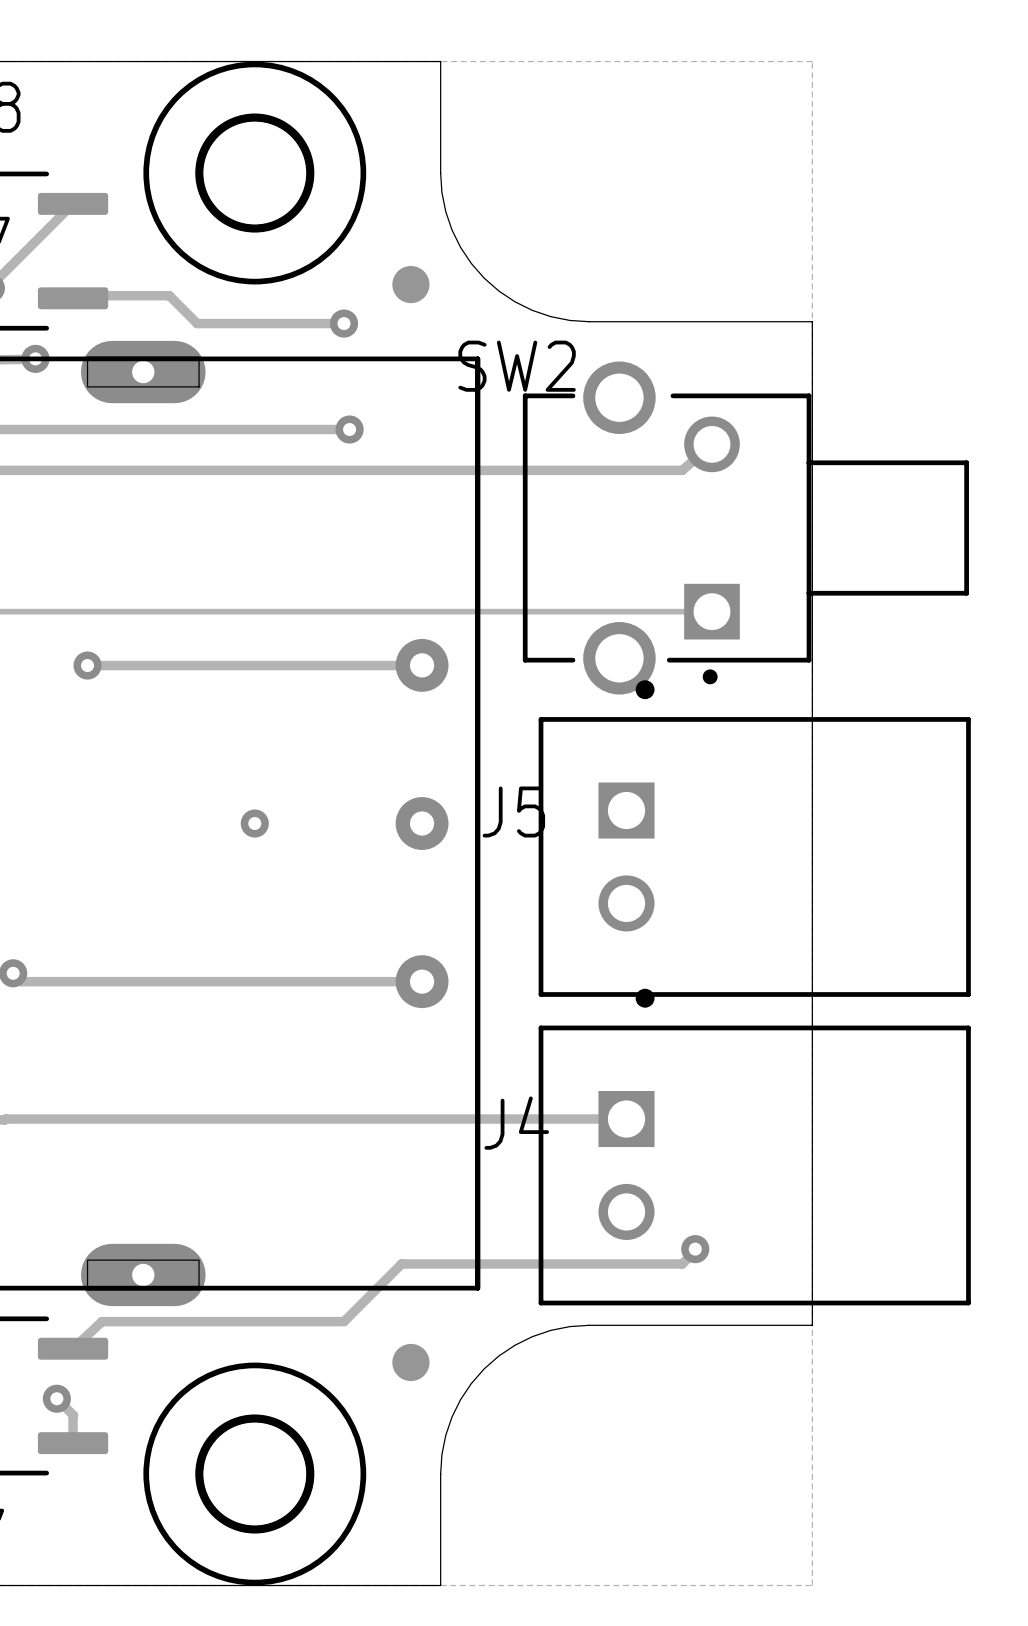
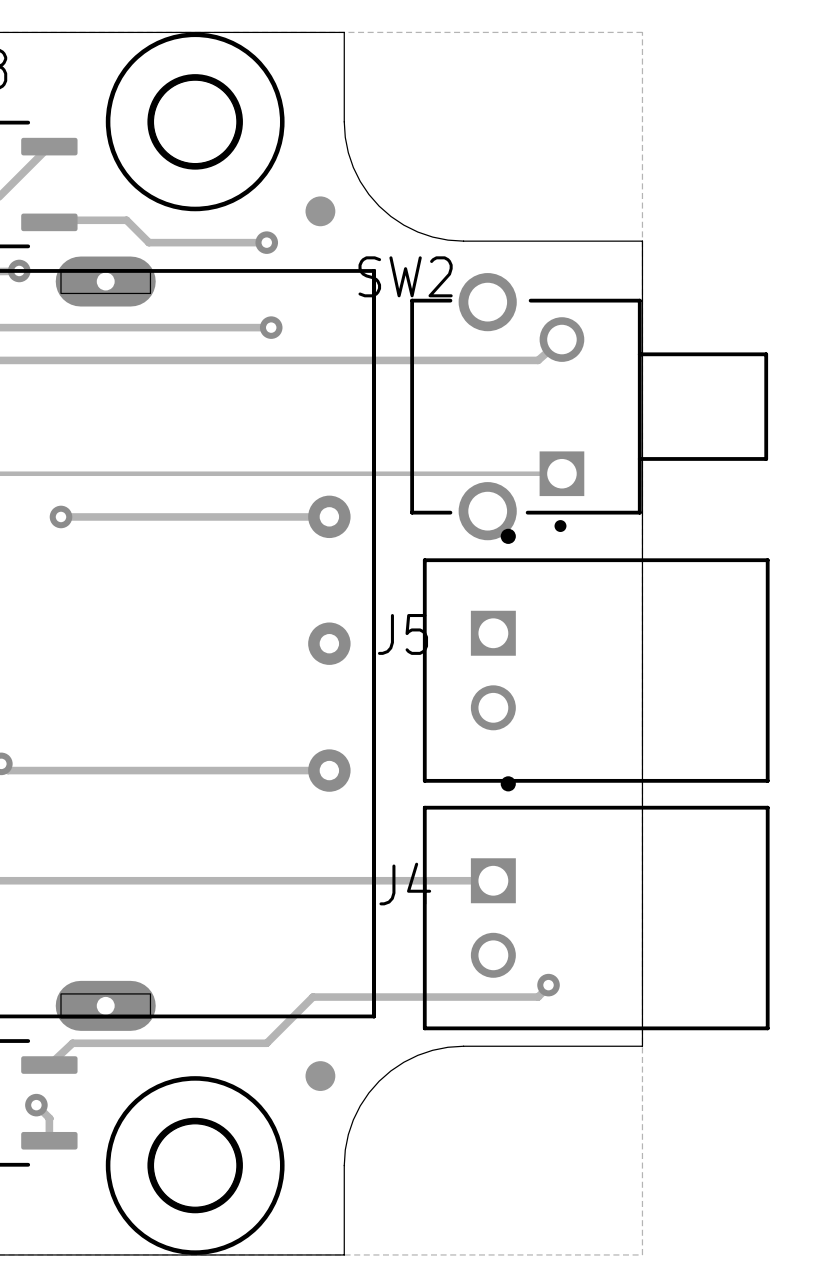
via: (254, 823) -> none

